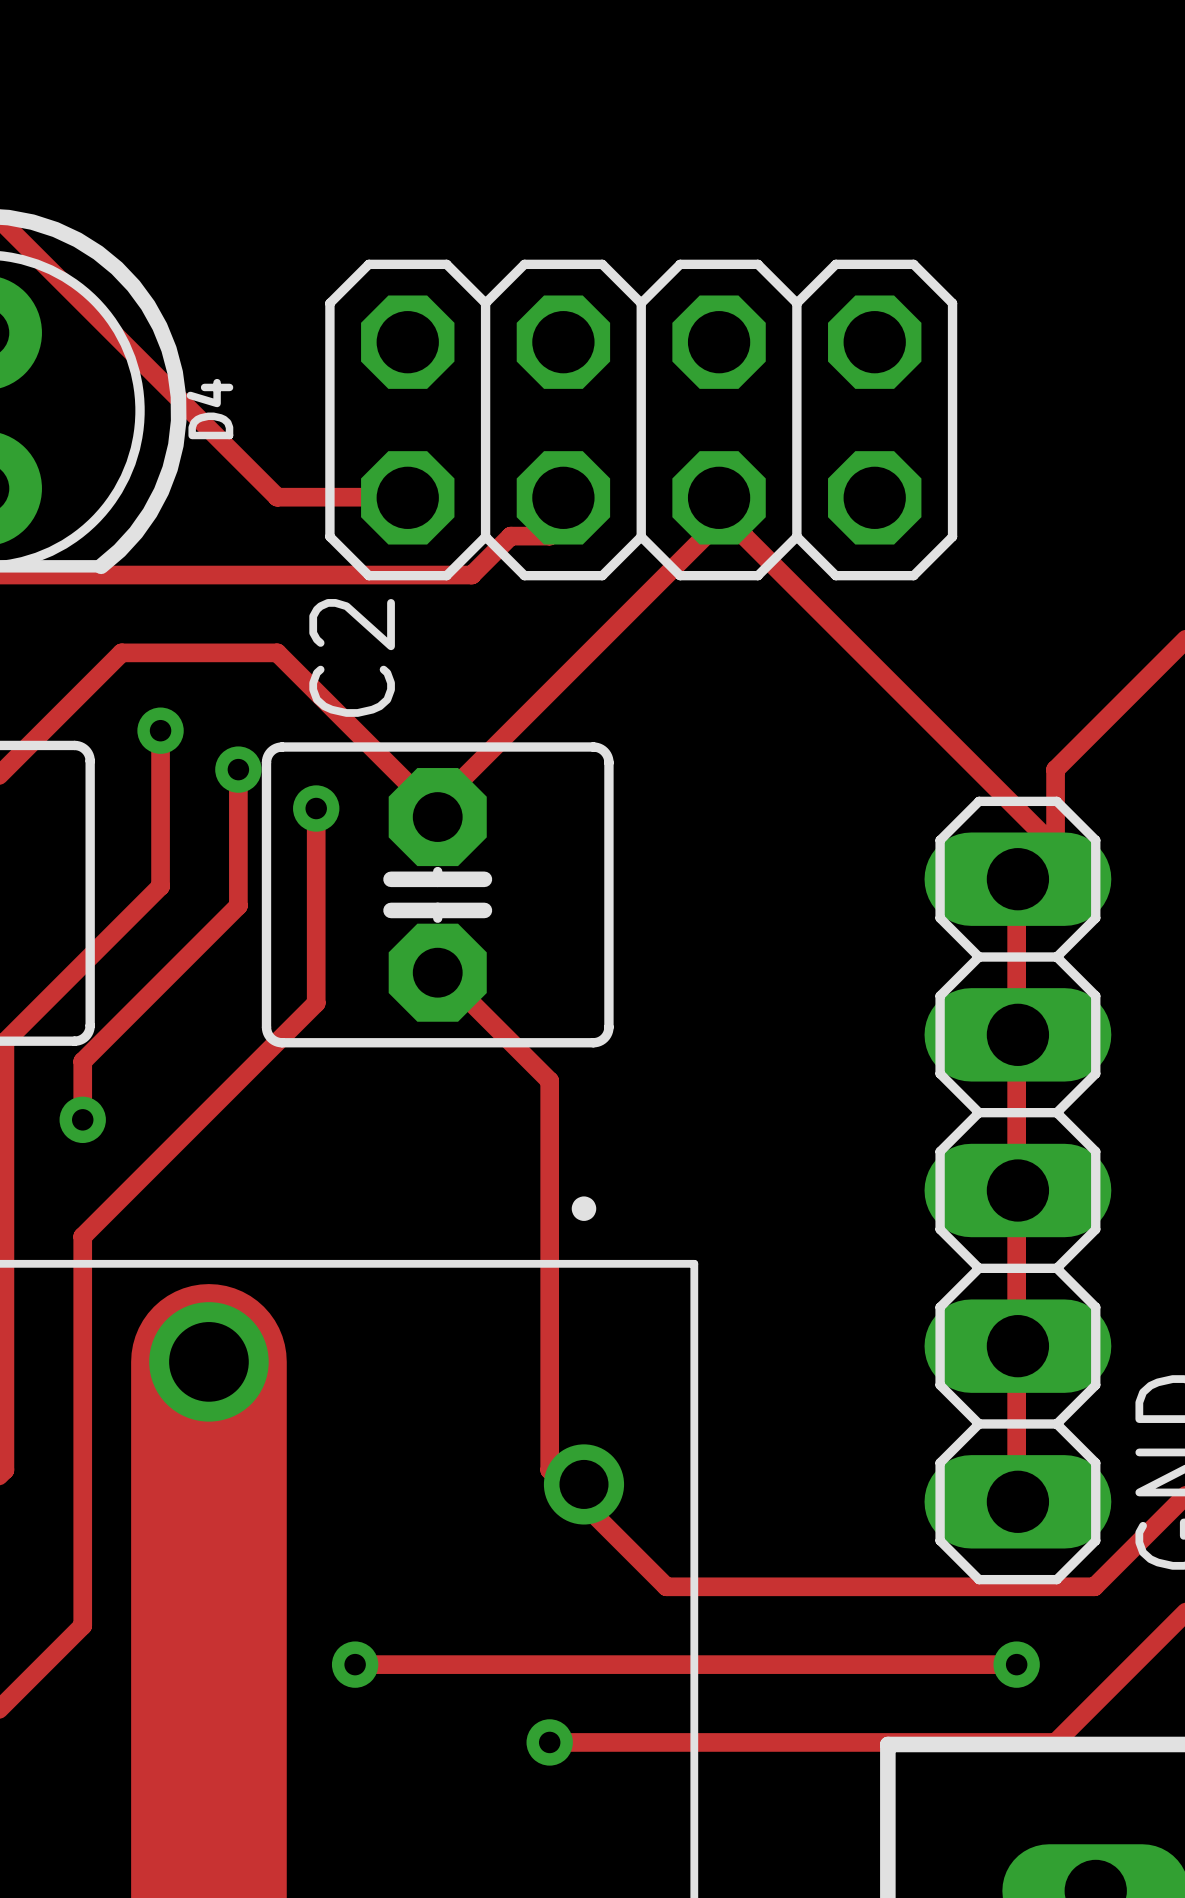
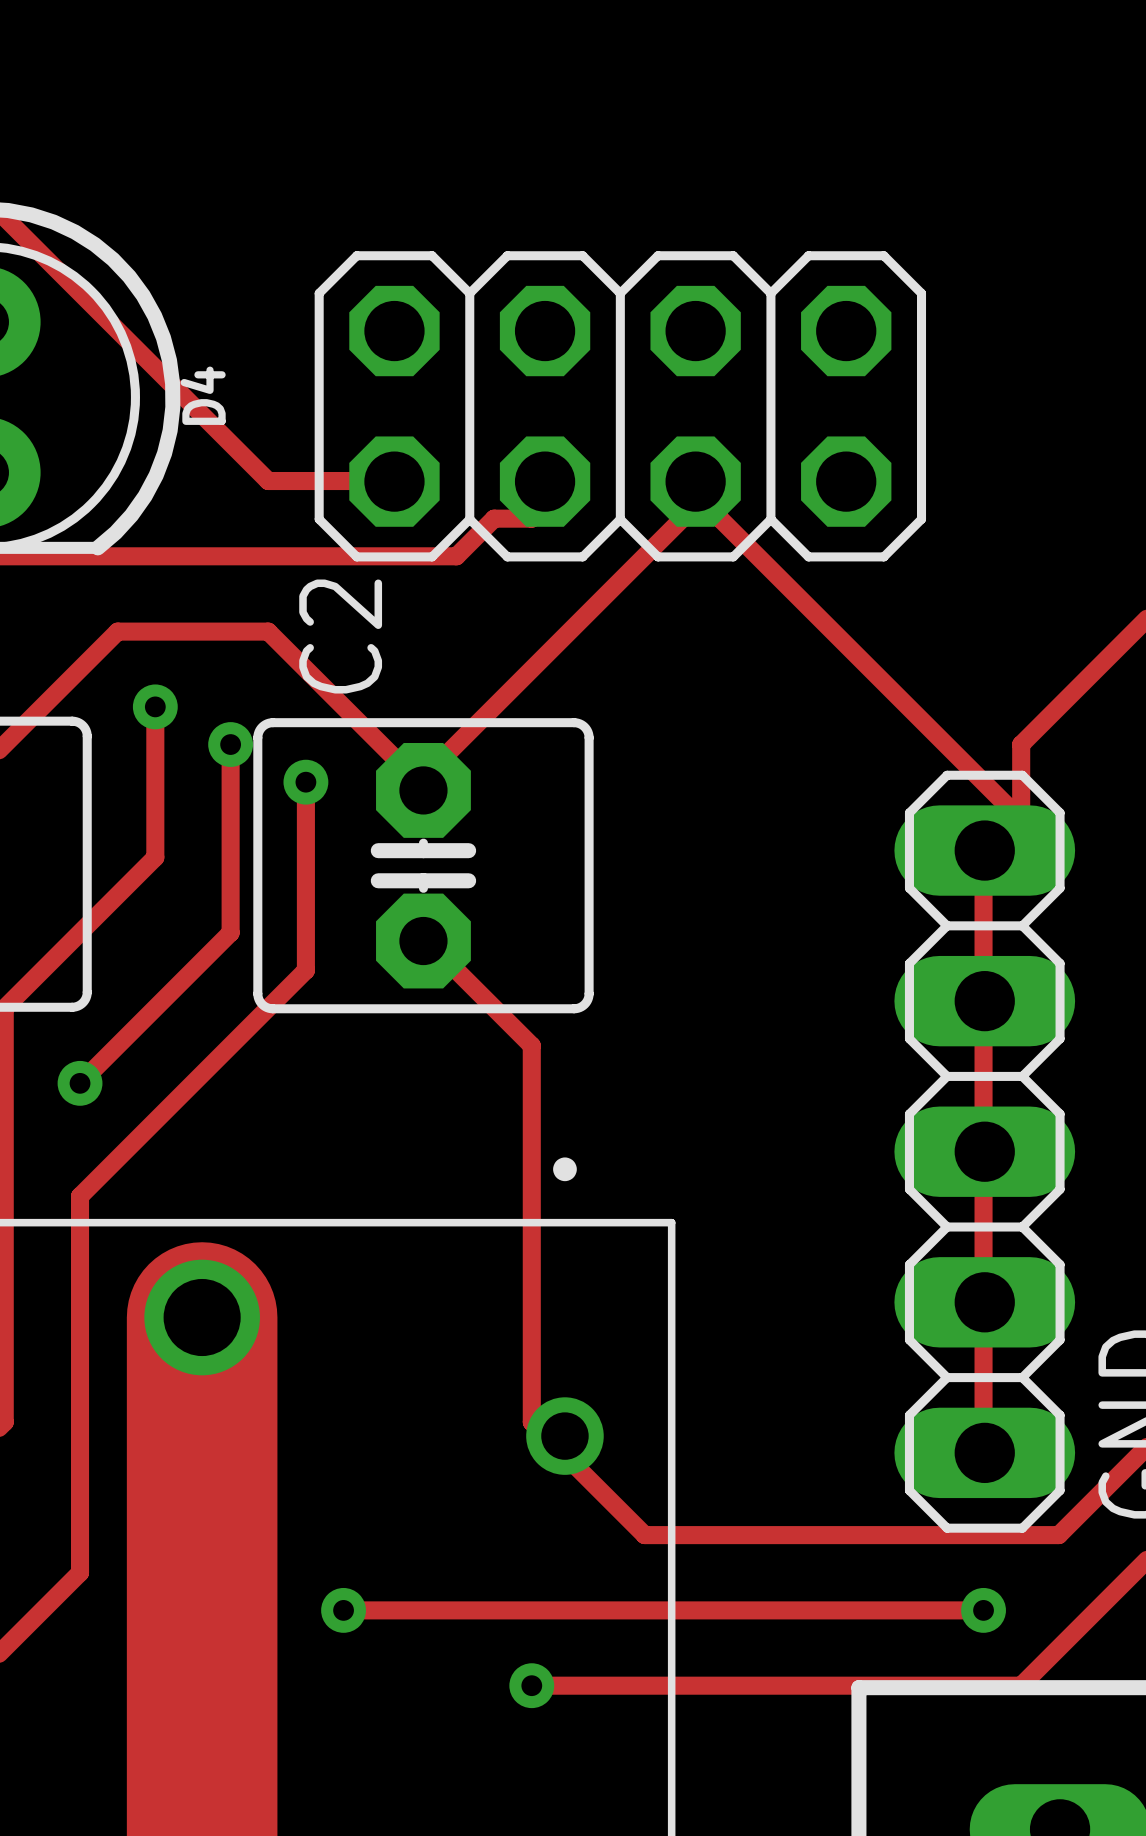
track: (238, 905) (82, 1061) (82, 1119) -> (230, 876) (230, 932) (80, 1083)

